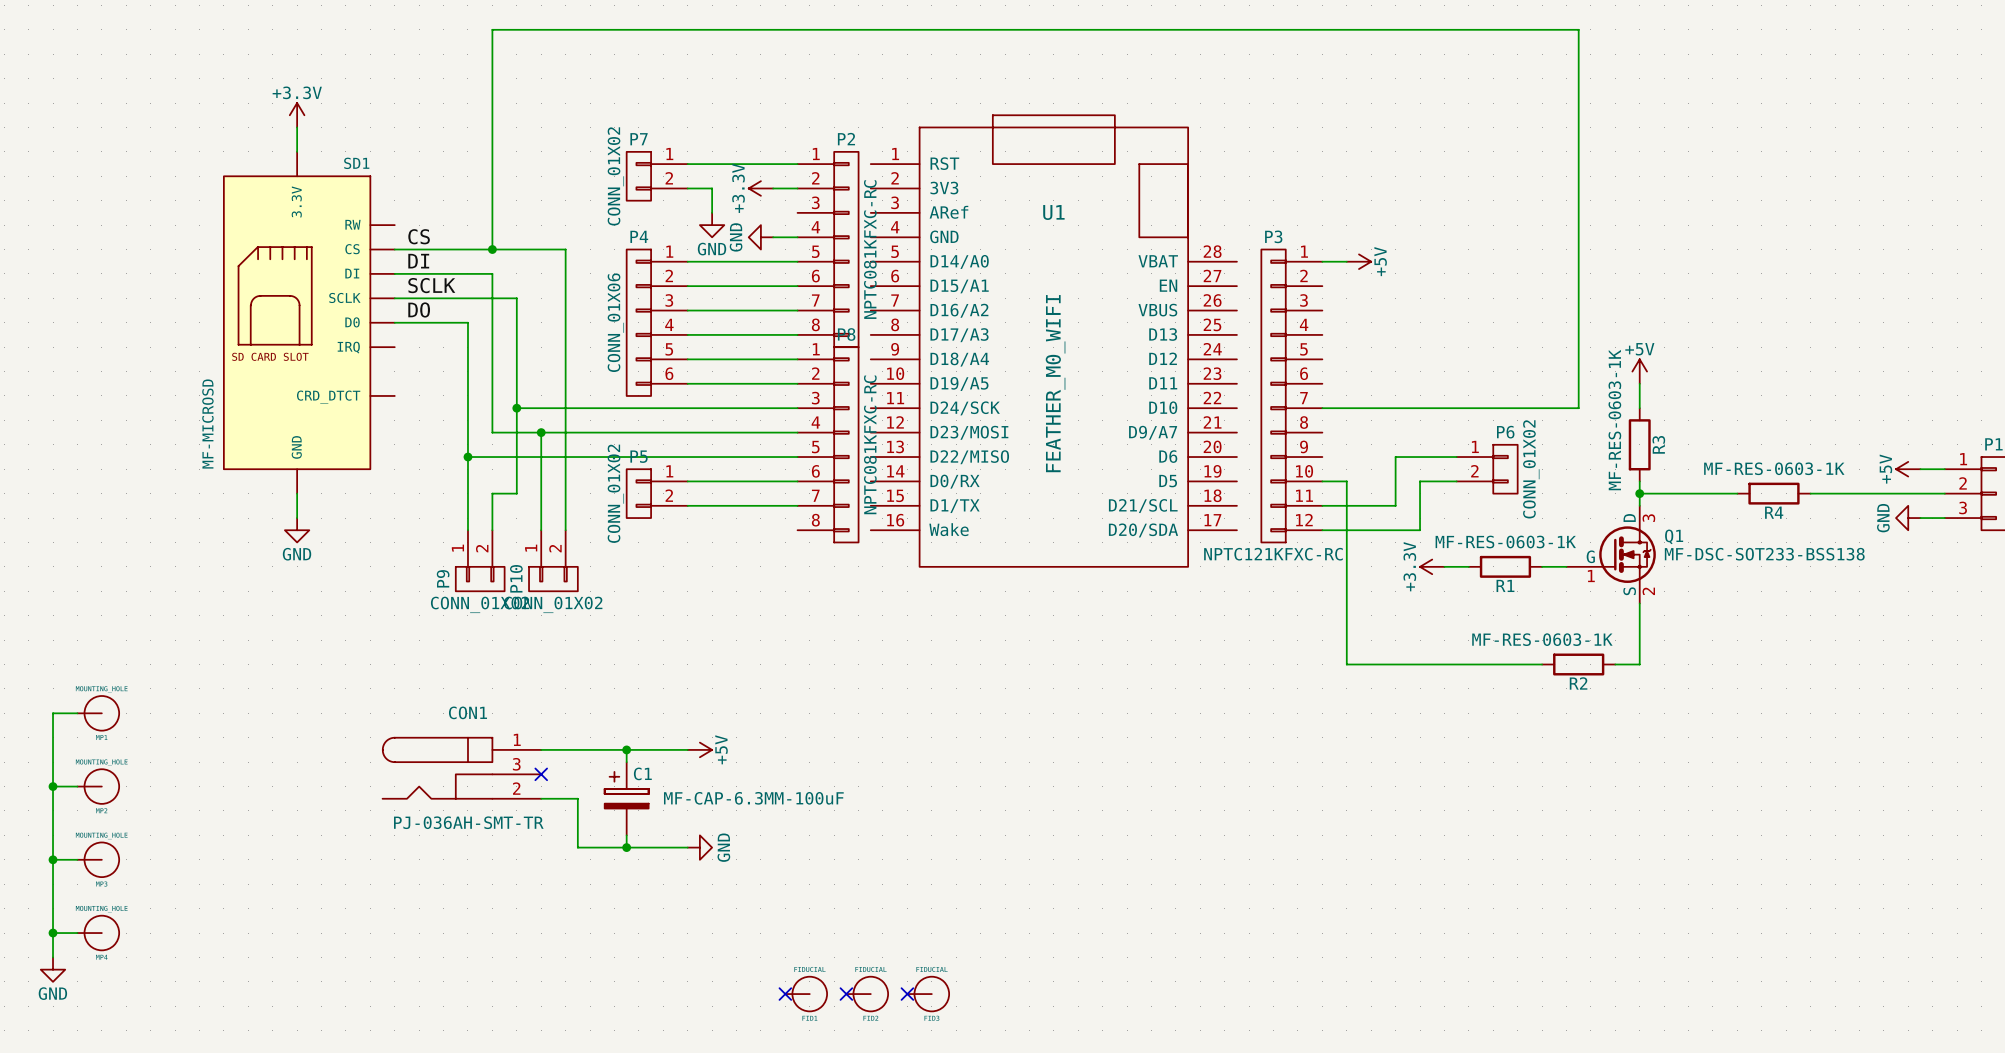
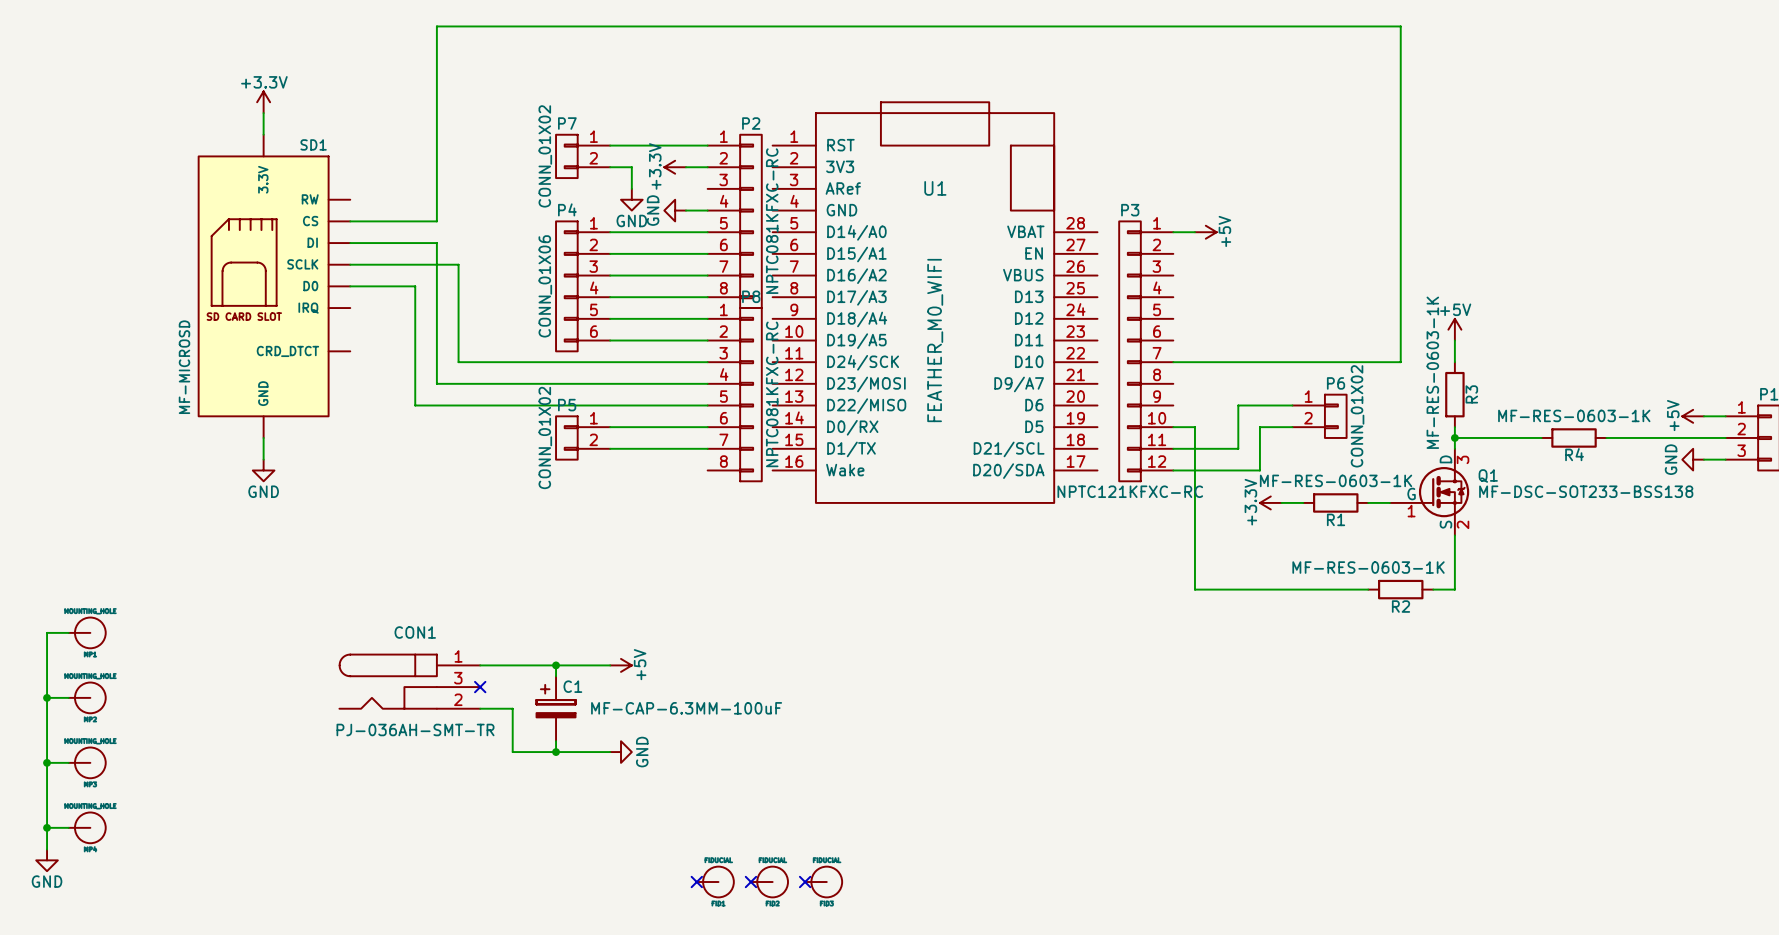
label: CS (419, 236) -> none
wire: (492, 249) (565, 249) (565, 530) -> none
junction: (492, 249) -> none
label: DI (418, 261) -> none
label: SCLK (431, 285) -> none
label: DO (419, 309) -> none
wire: (516, 408) (516, 493) (492, 493) (492, 530) -> none
junction: (516, 408) -> none
wire: (541, 432) (541, 530) -> none
junction: (541, 432) -> none
wire: (467, 457) (467, 530) -> none
junction: (467, 457) -> none
P9: CONN_01X02 (480, 560) -> none
P10: CONN_01X02 (553, 560) -> none

